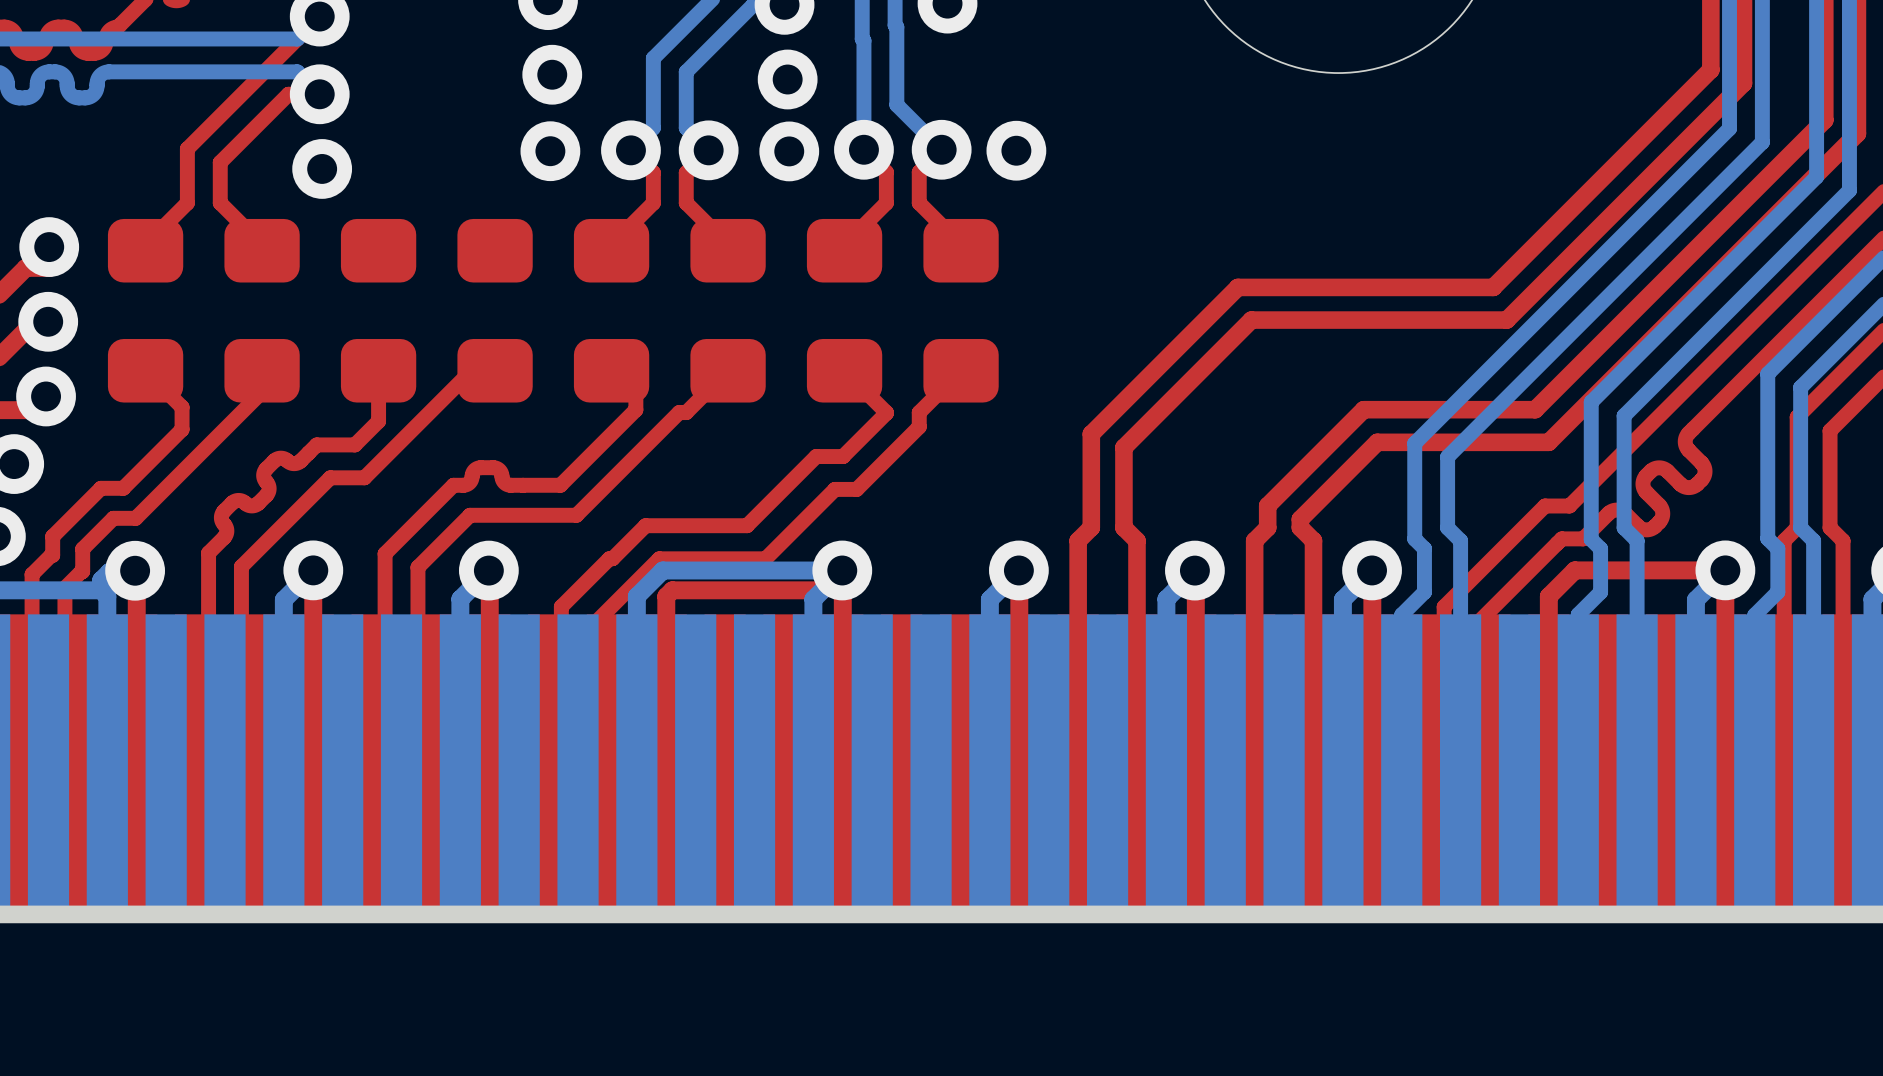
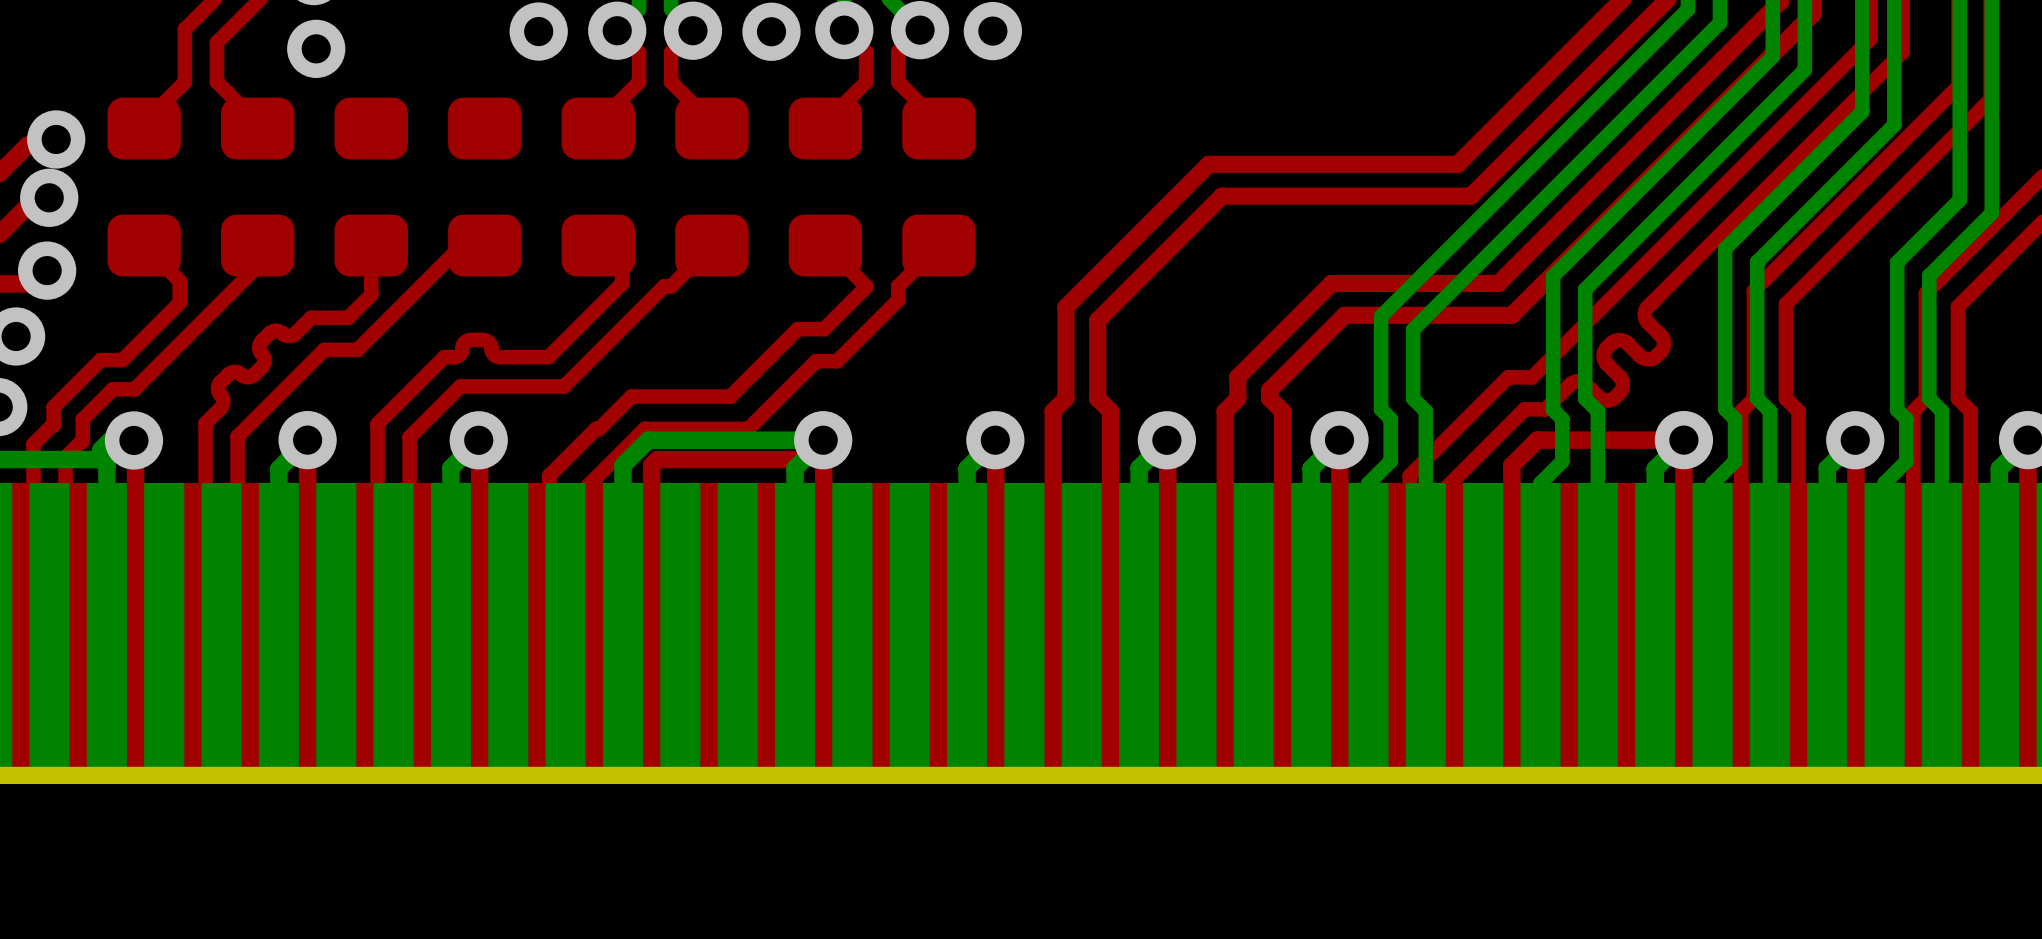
via position: (49, 247) -> (56, 139)

